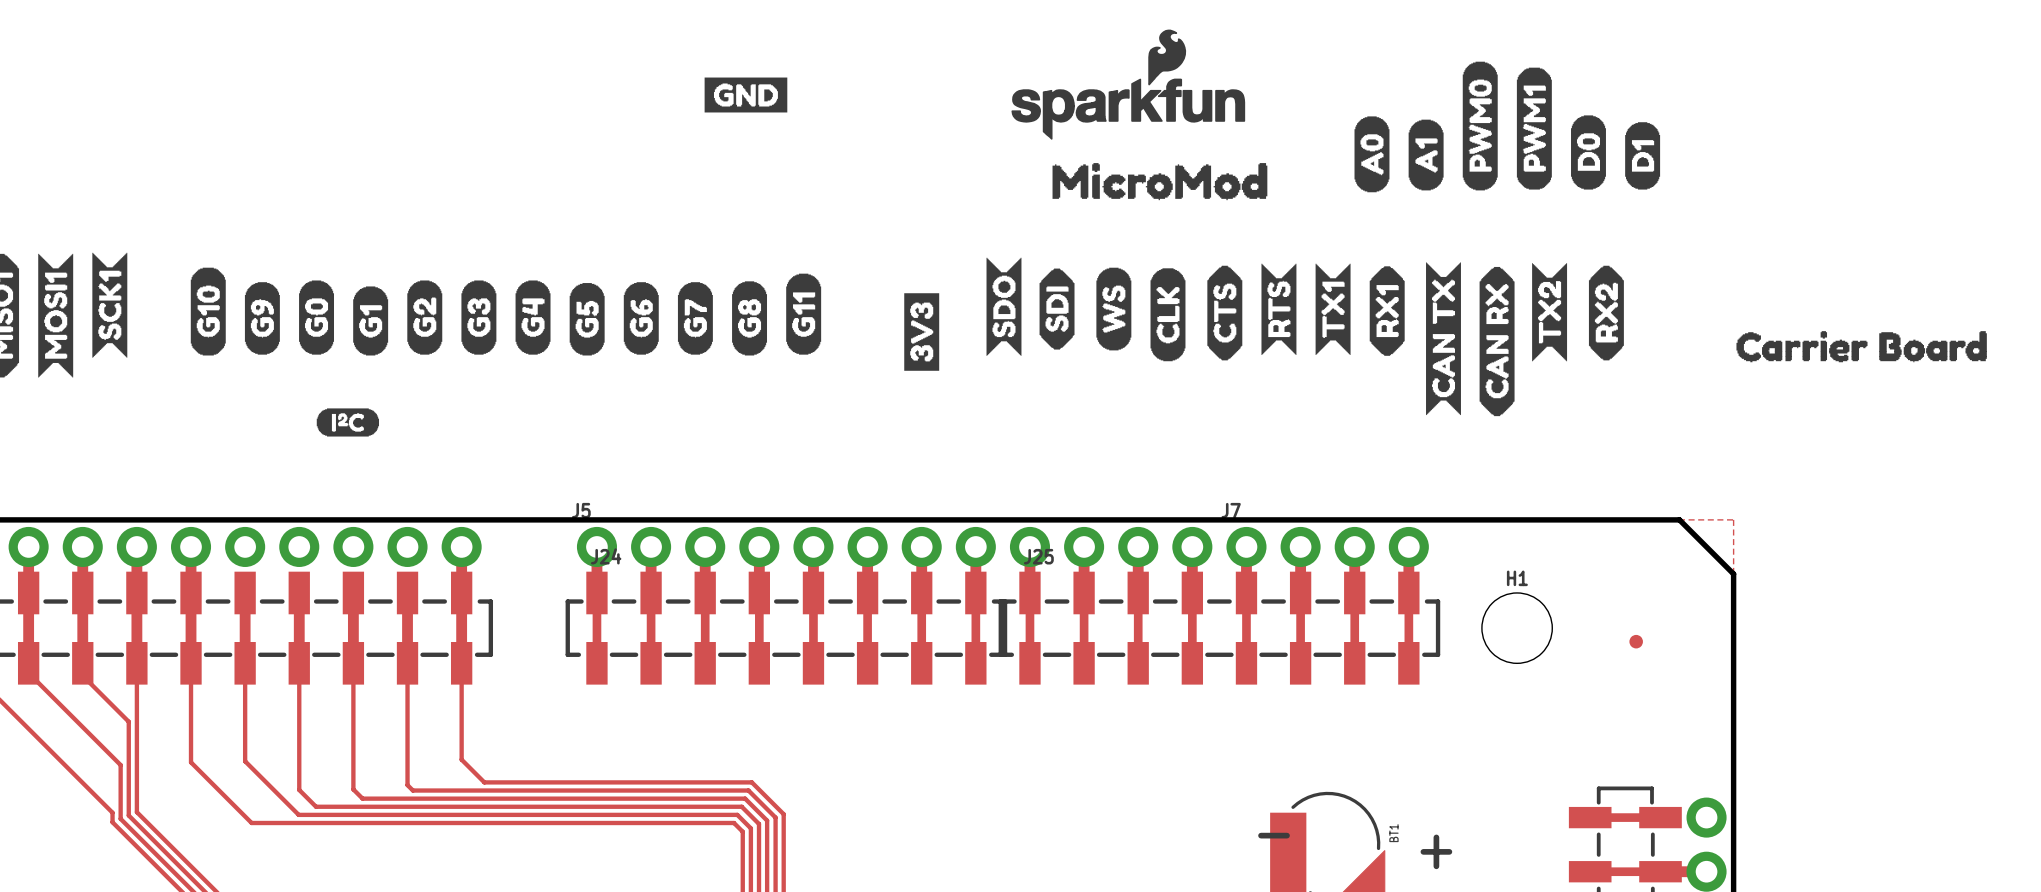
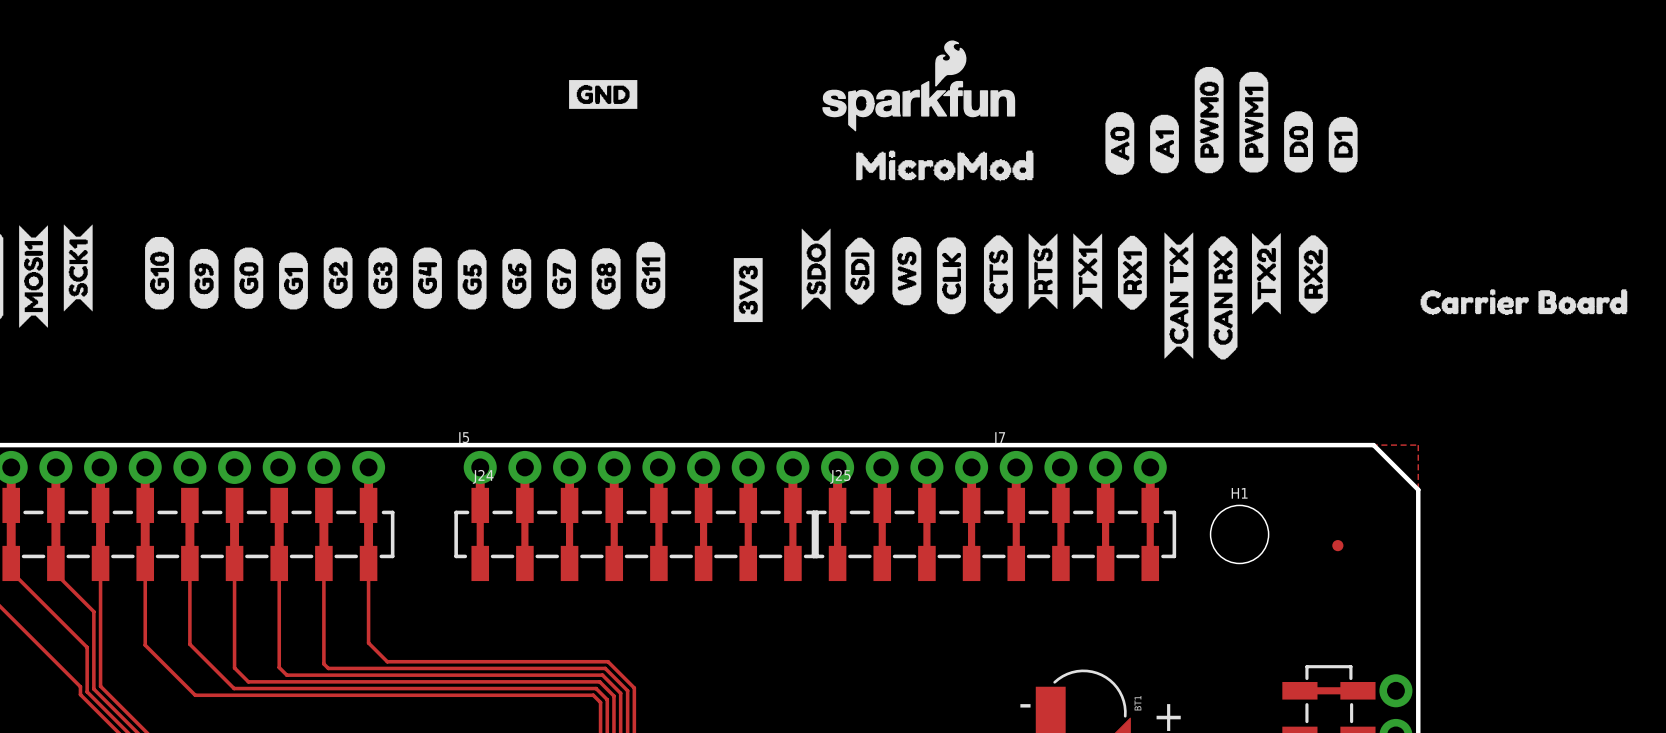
drawing: [316, 408, 380, 437] -> none

